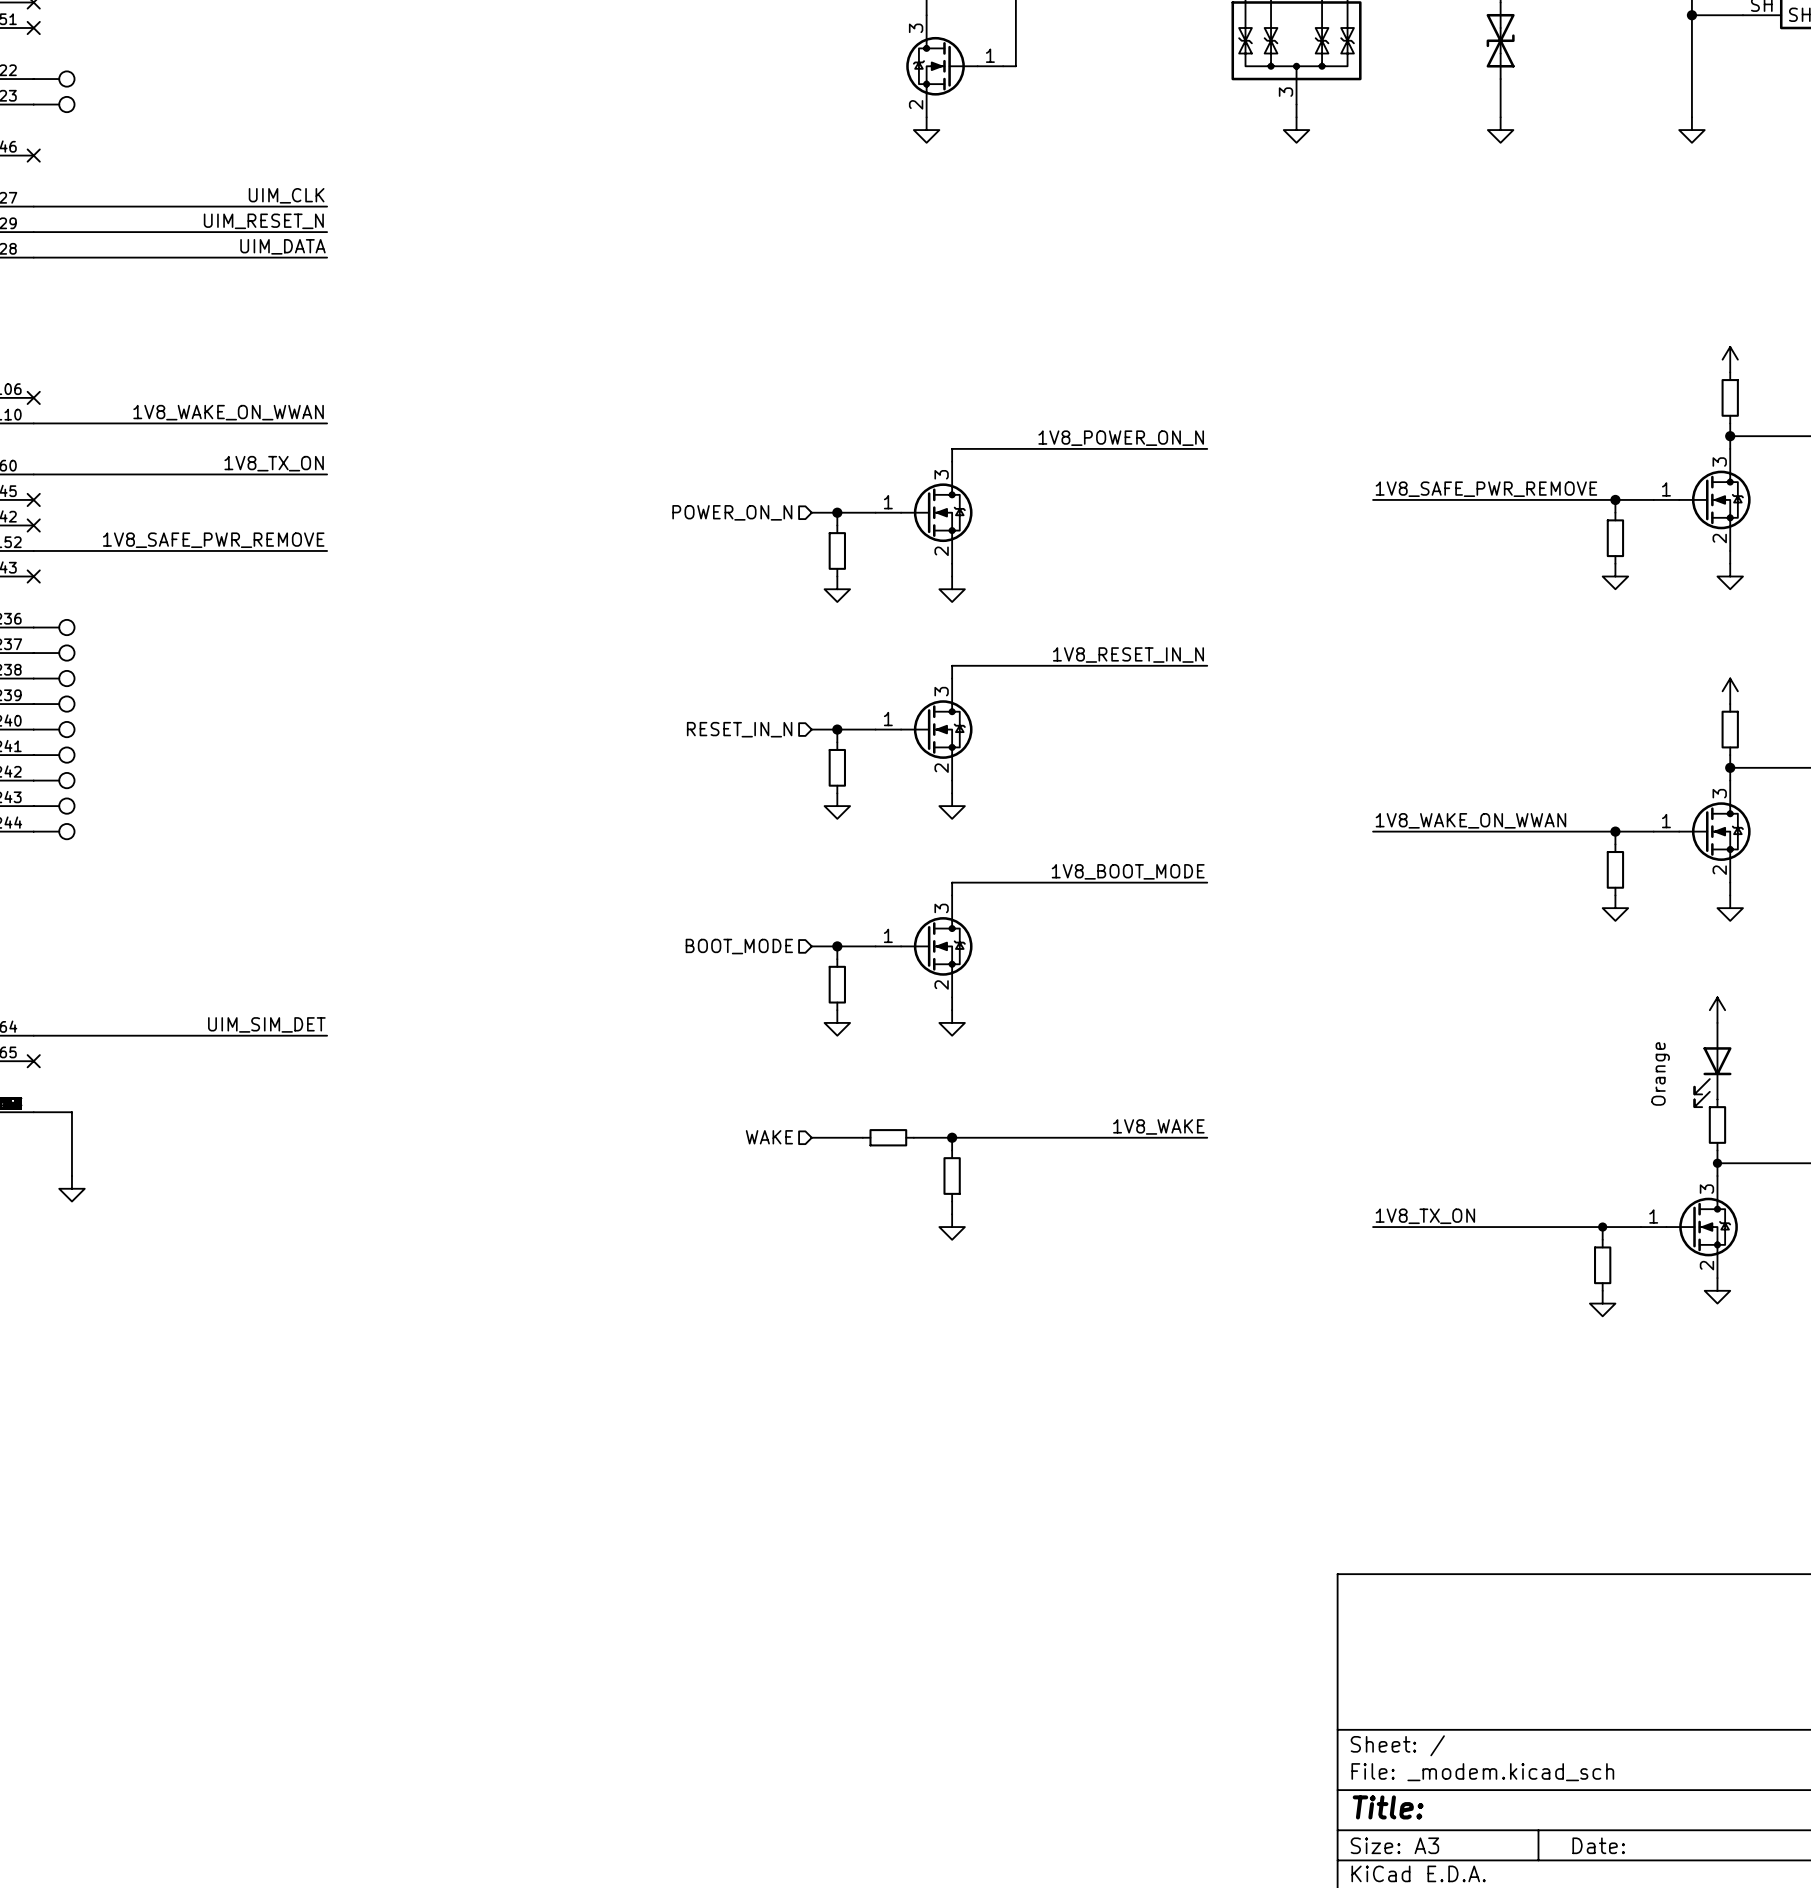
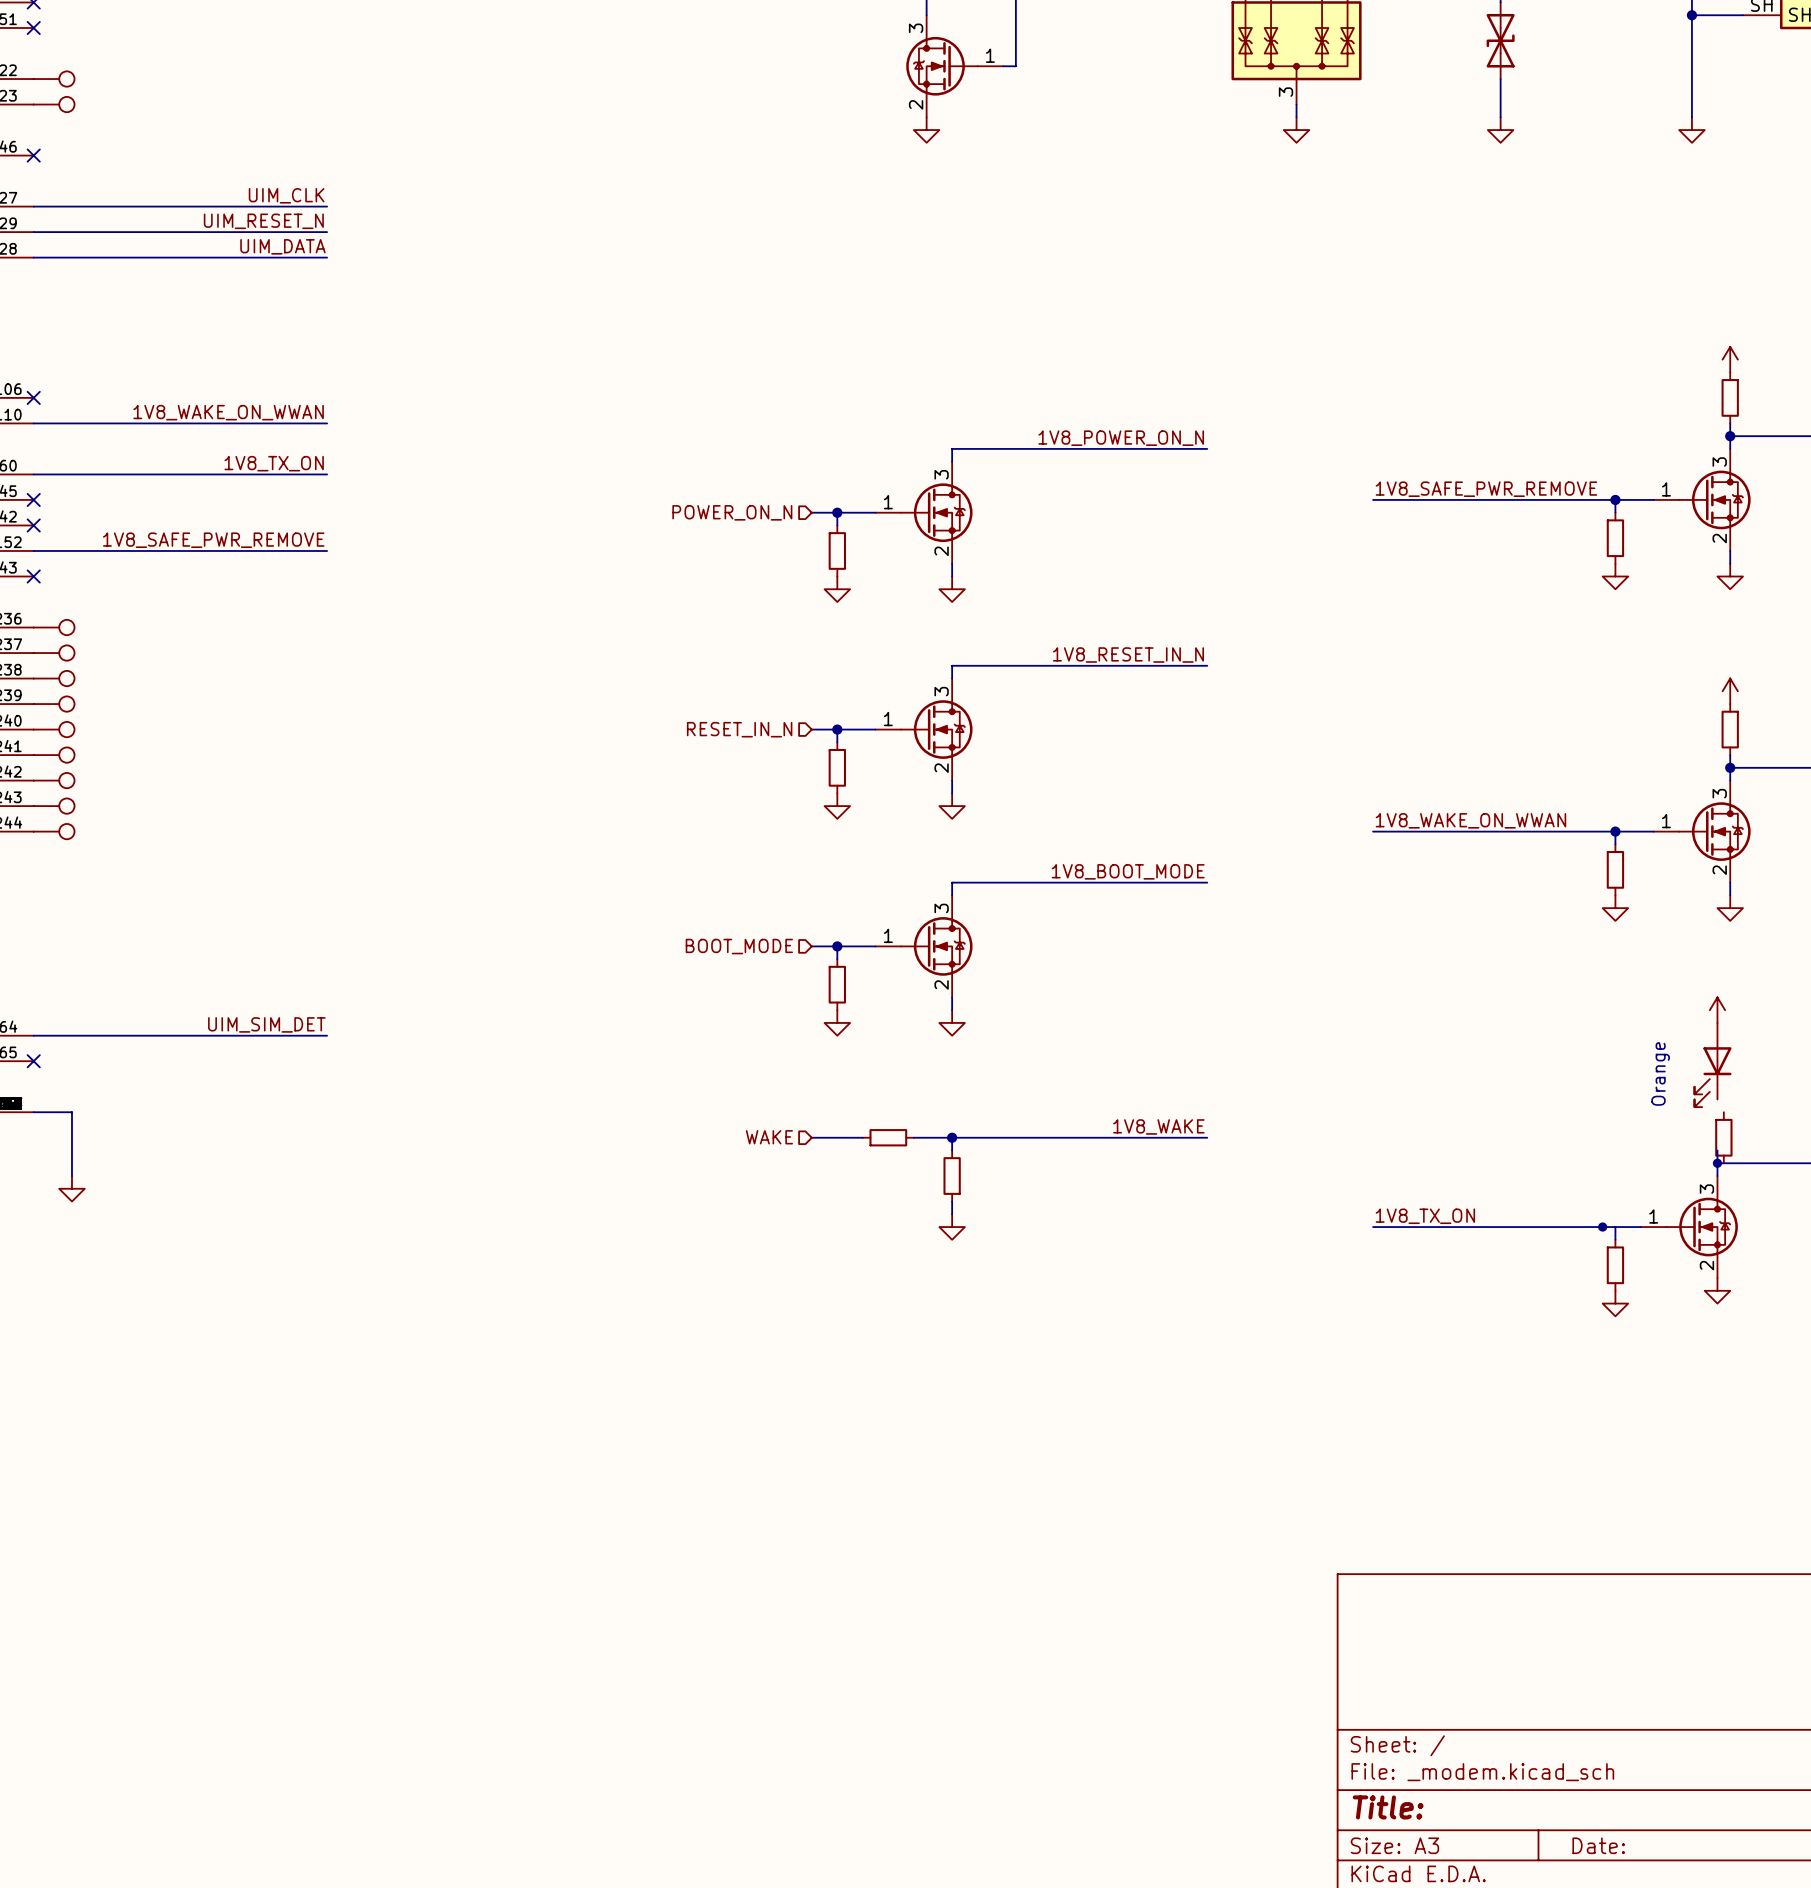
part position: (1717, 1124) -> (1723, 1137)
wire: (1602, 1227) (1602, 1239) -> (1615, 1227) (1615, 1239)
part position: (1602, 1265) -> (1615, 1265)
power symbol position: (1602, 1303) -> (1615, 1303)

